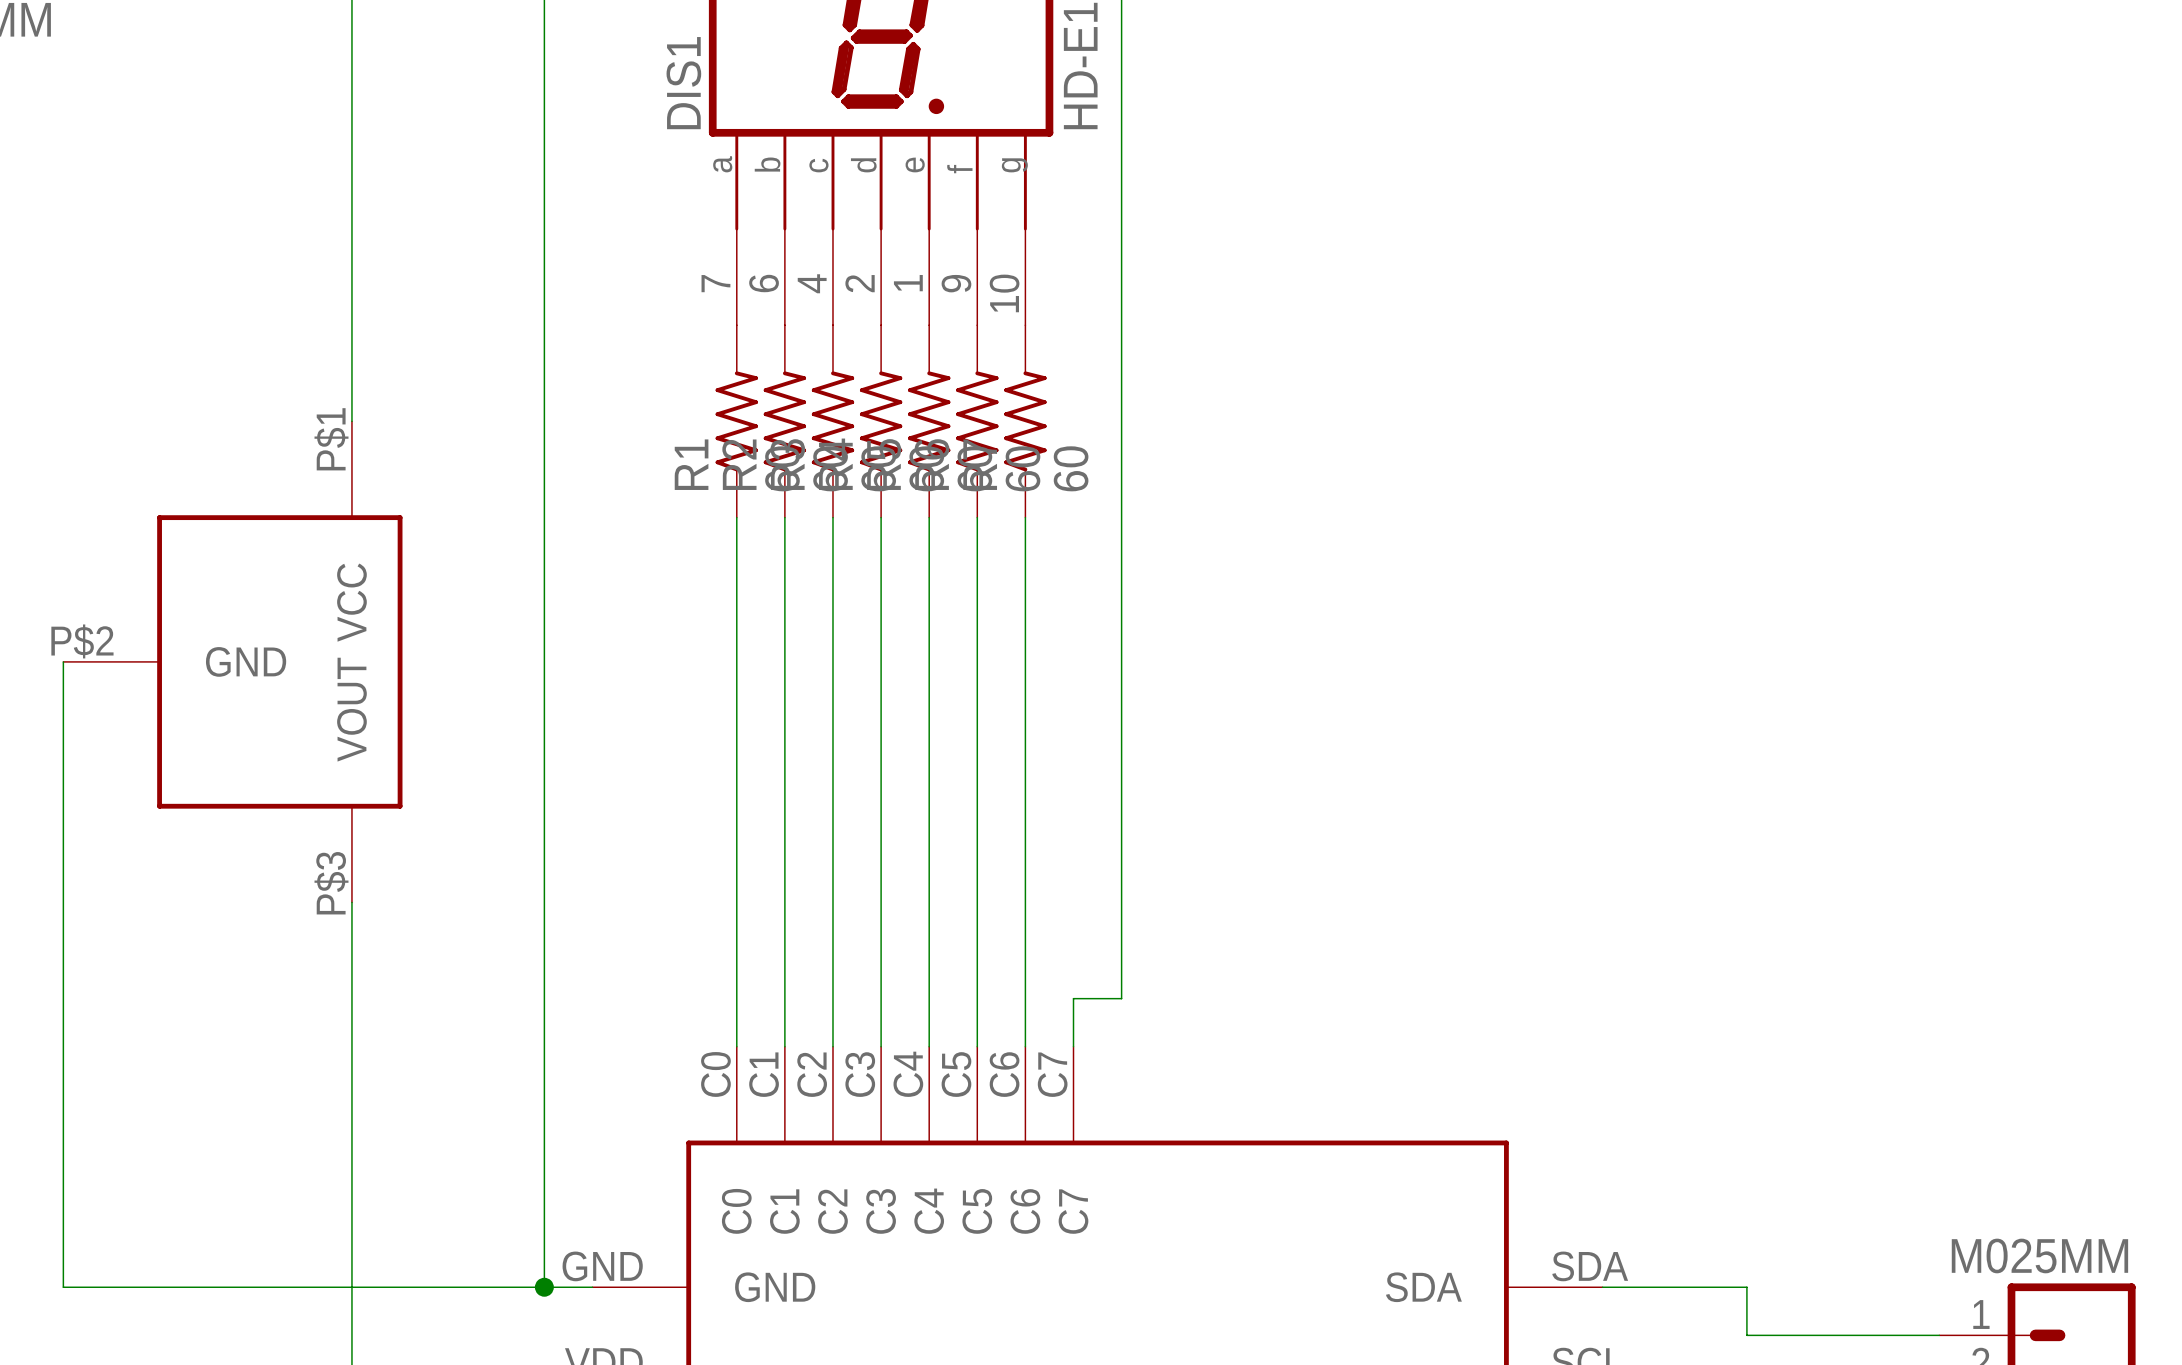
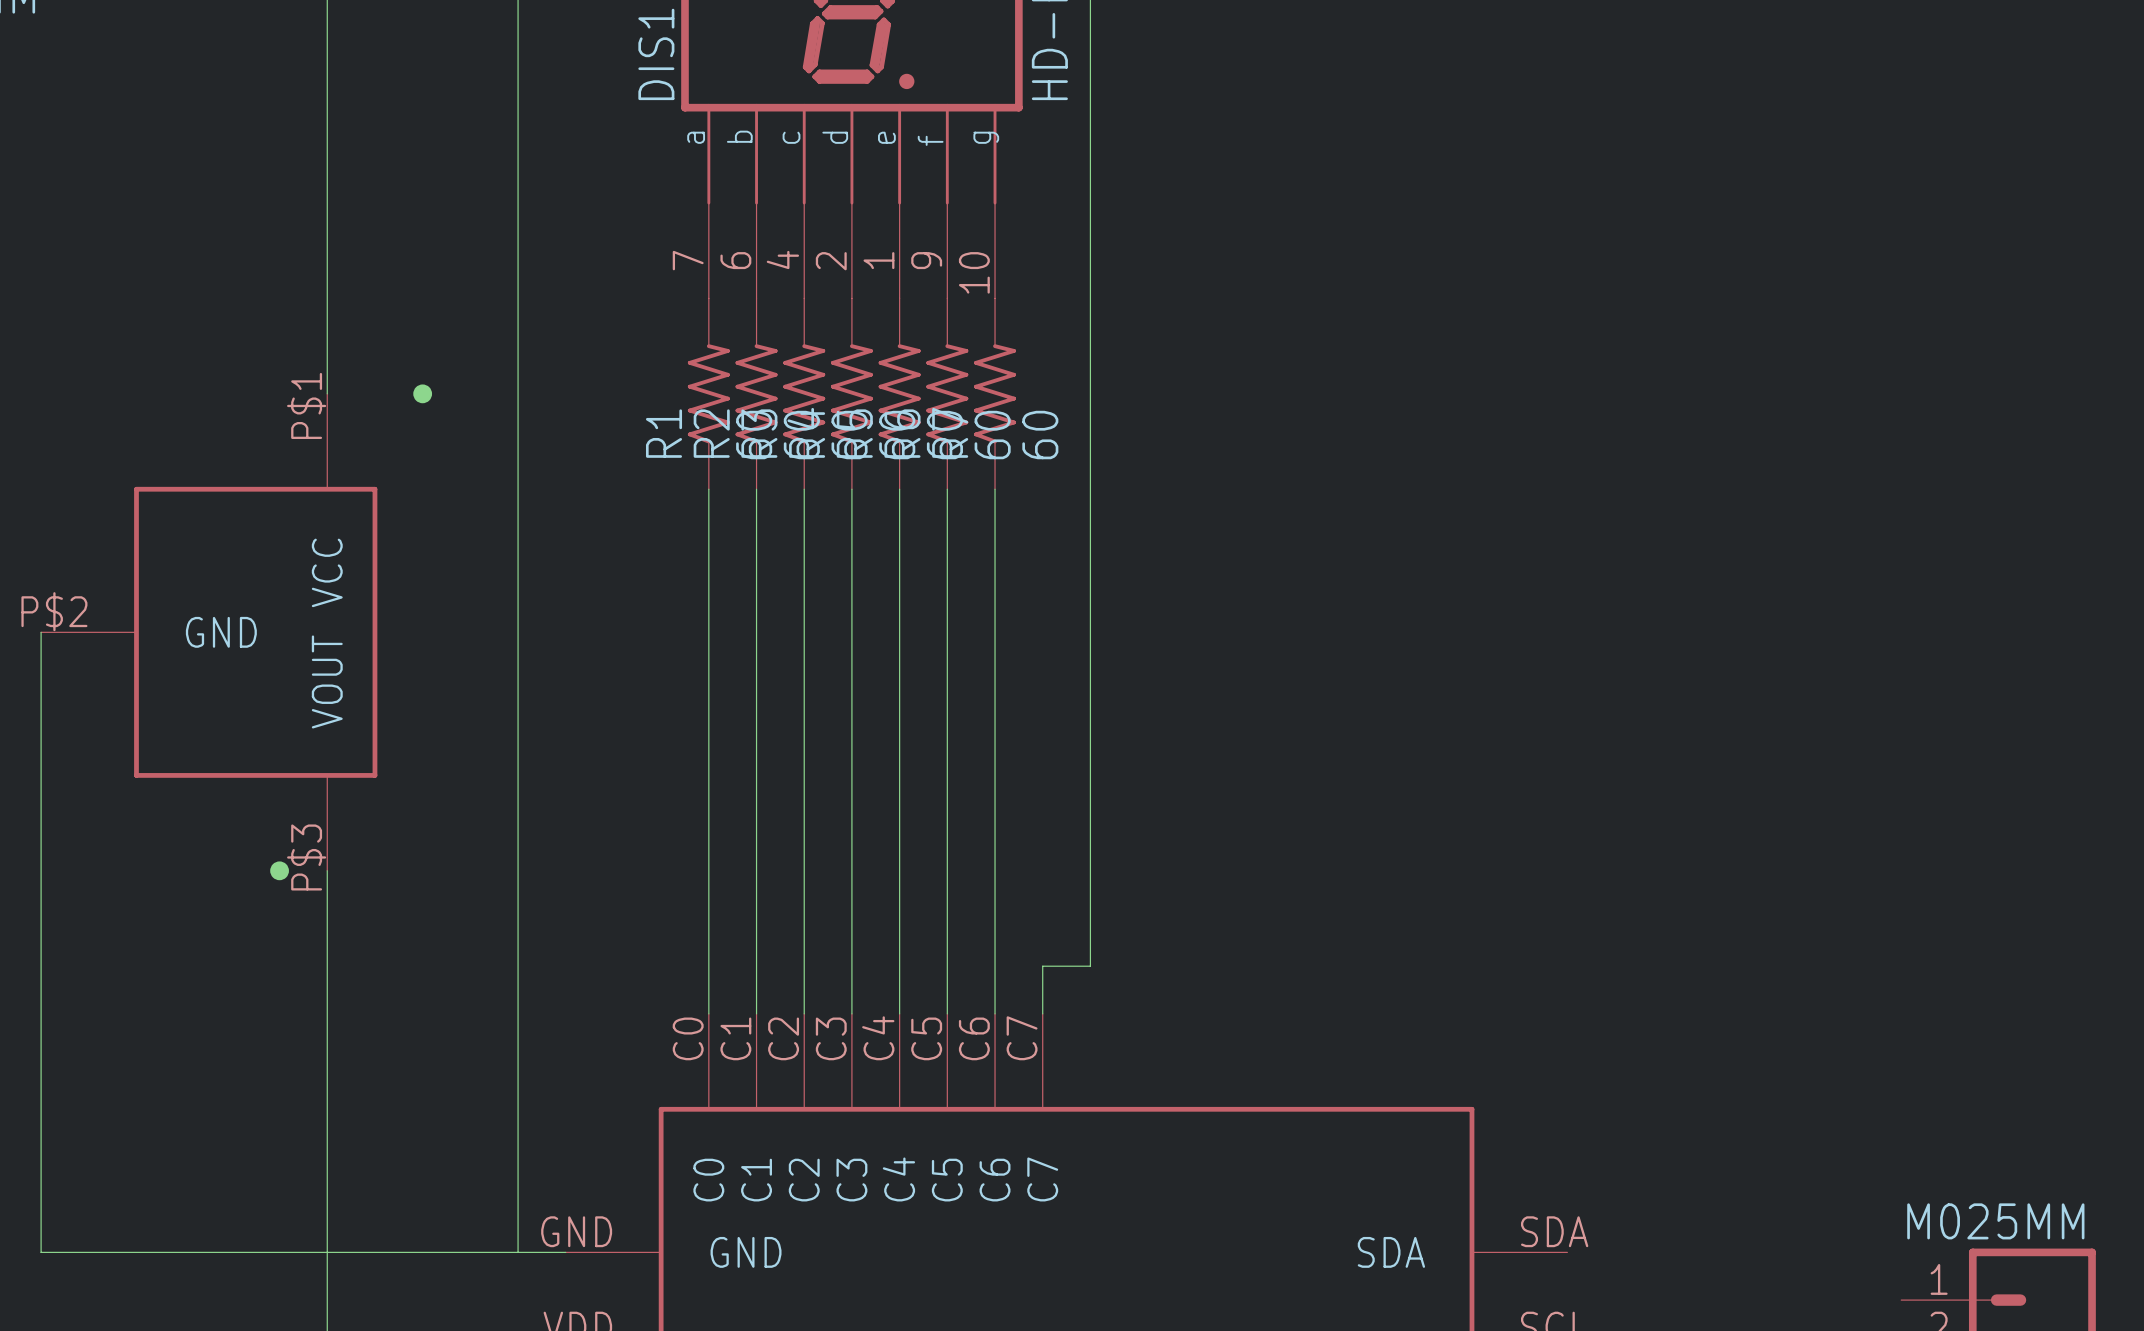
junction: none -> (422, 393)
junction: none -> (279, 870)
junction: (544, 1287) -> none
wire: (1602, 1287) (1746, 1287) (1746, 1335) (1939, 1335) -> none

